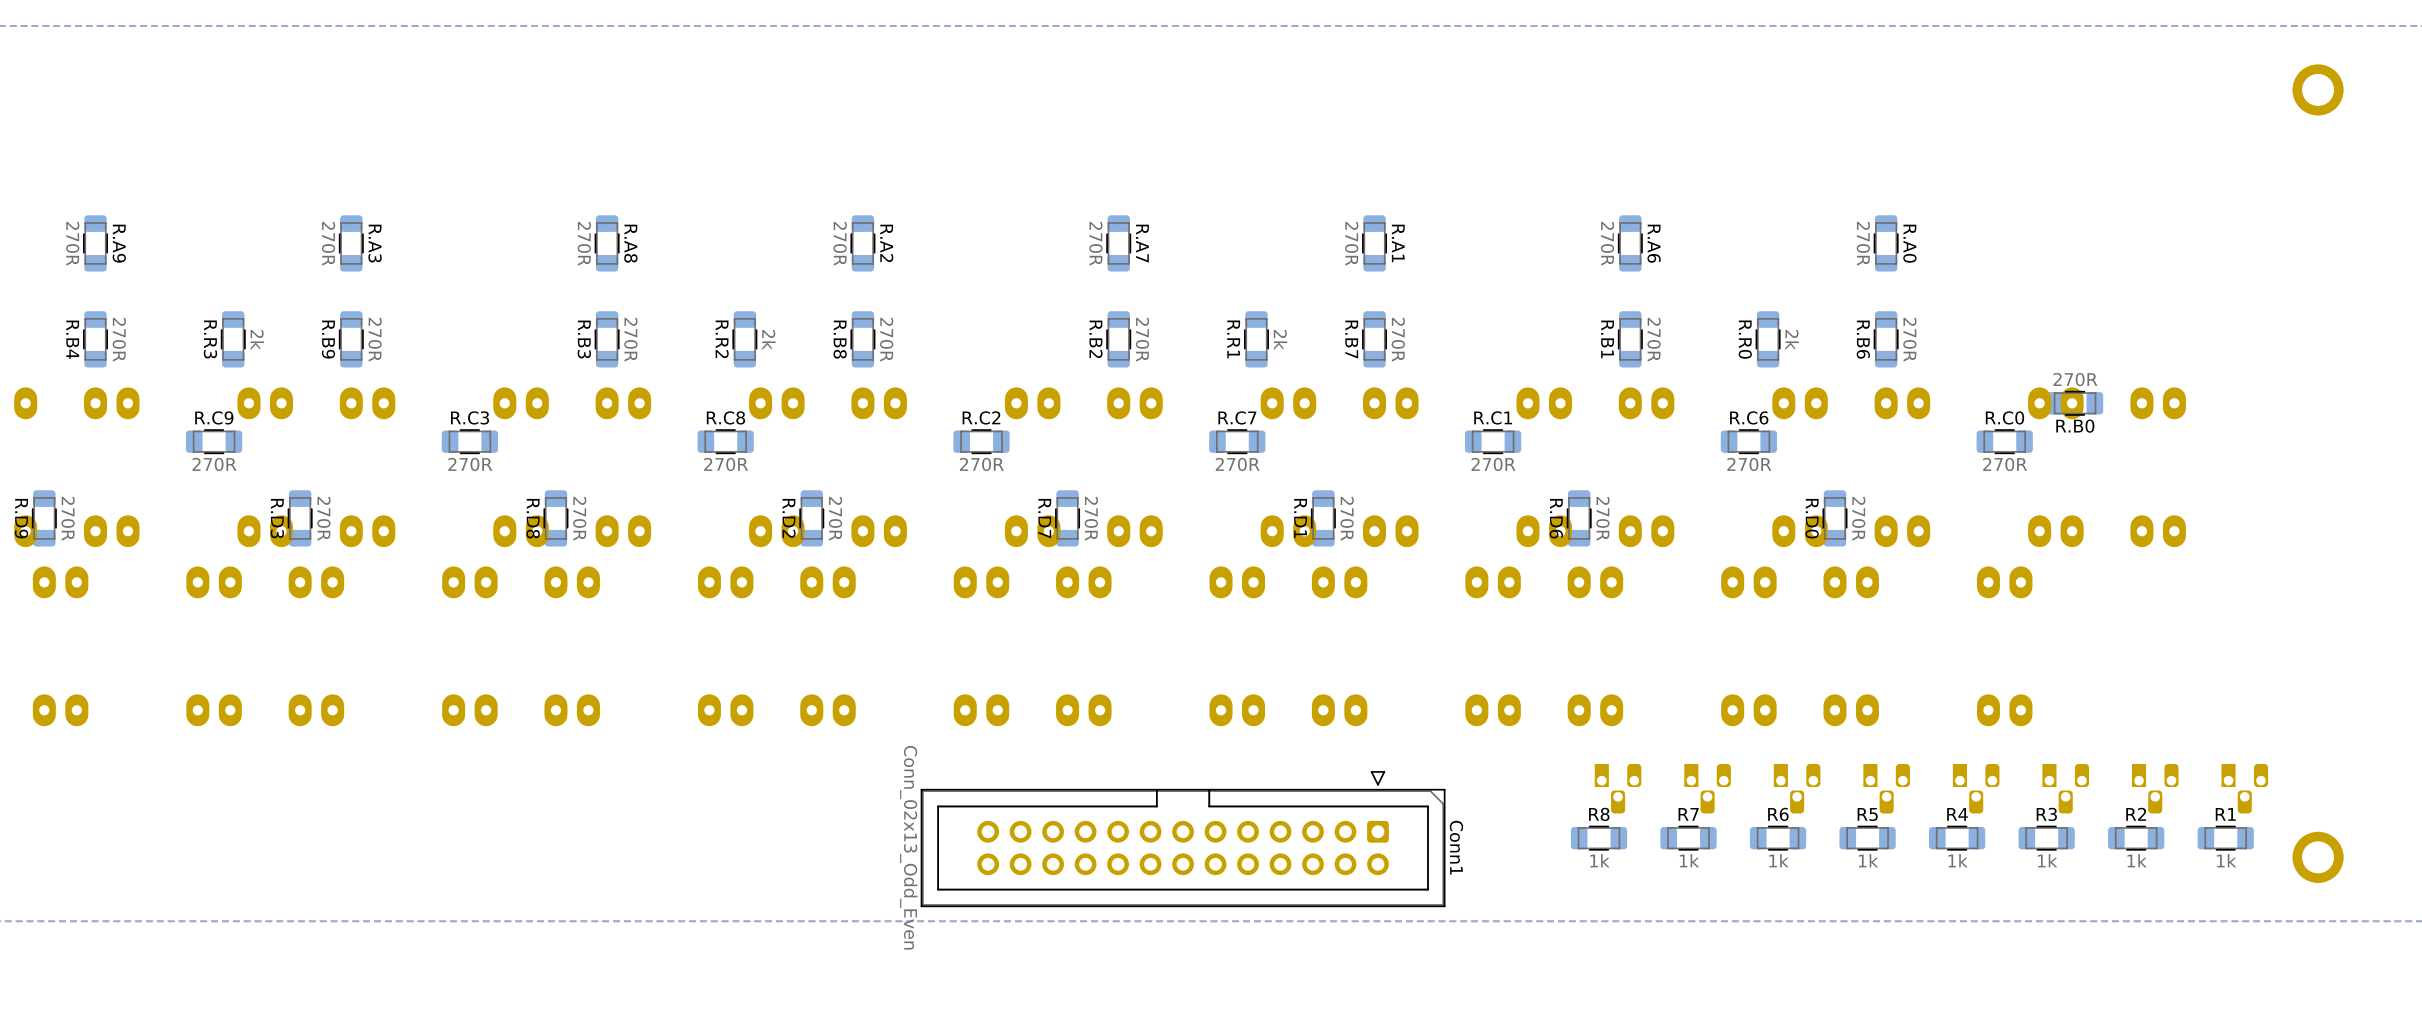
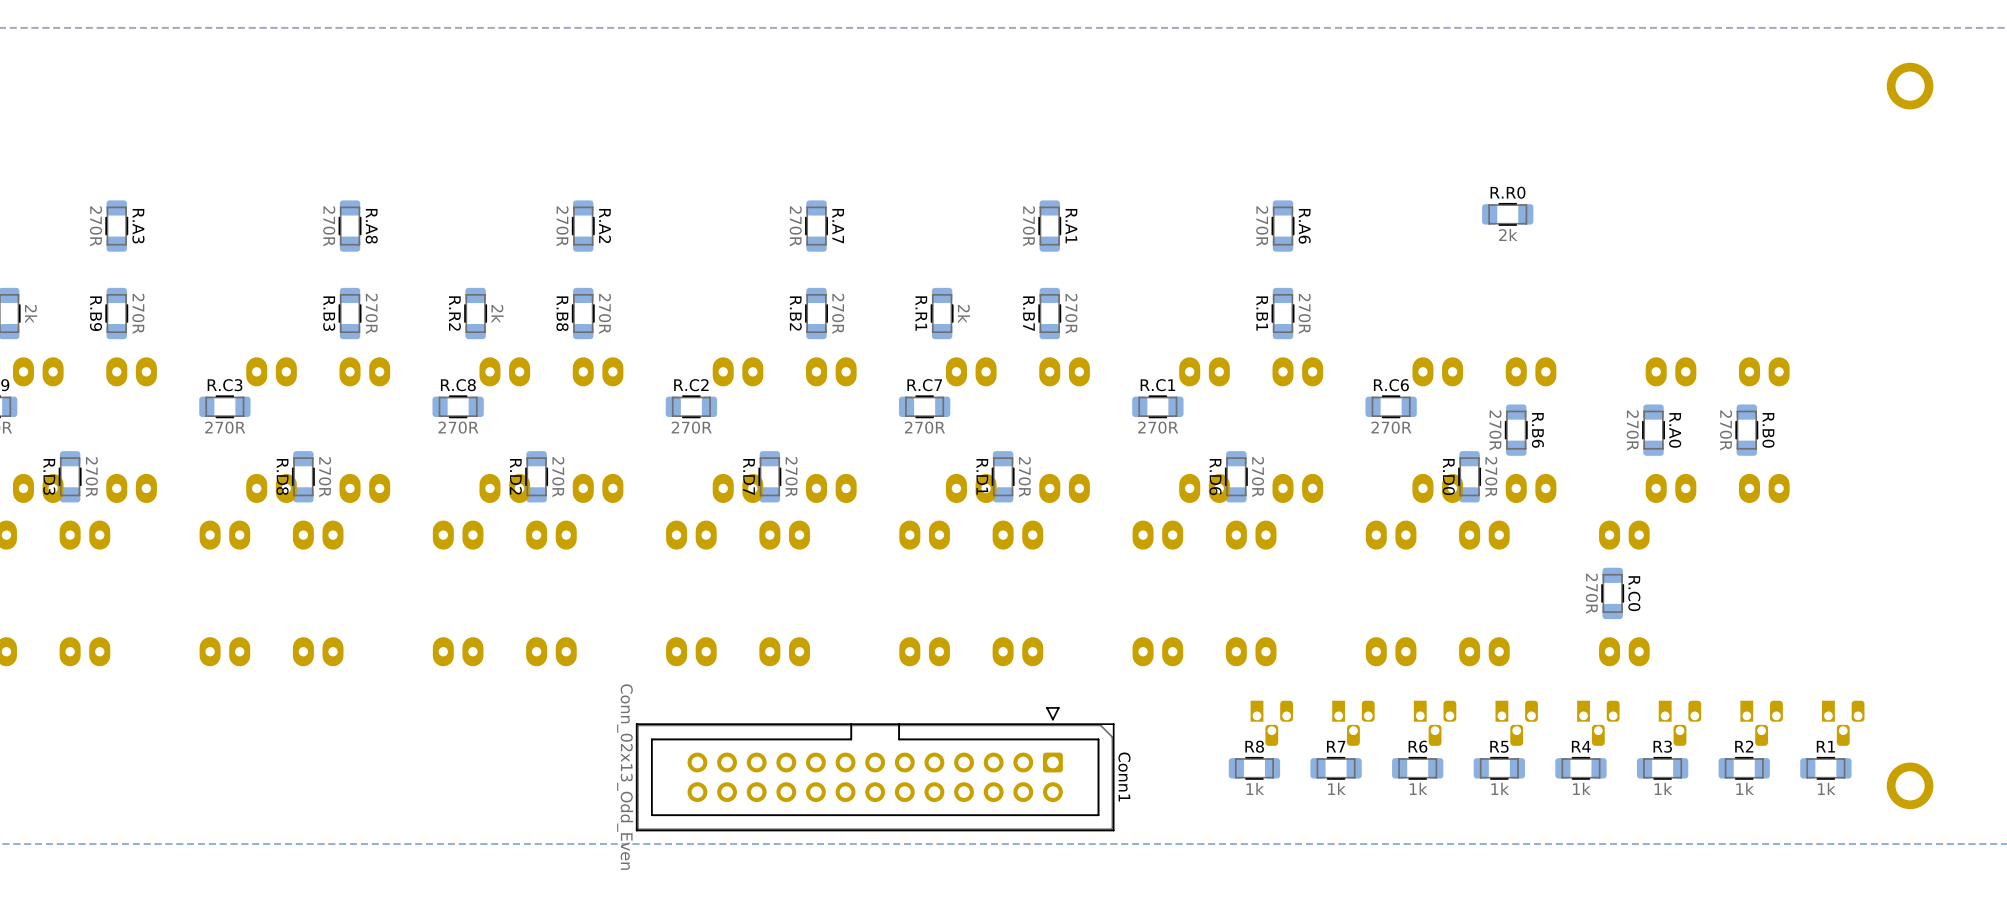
R.A0 position: (1886, 243) -> (1653, 430)
R.R0 rotation: 0° (1768, 339) -> 90° clockwise (1507, 214)
R.R0 position: (1768, 339) -> (1507, 214)
R.B6 name position: R.B6 (1863, 339) -> R.B6 (1537, 430)
R.B6 position: (1886, 339) -> (1516, 430)
R.B6 value position: 270R (1909, 339) -> 270R (1495, 430)
R.B0 value position: 270R (2075, 379) -> 270R (1726, 430)
R.B0 rotation: 0° (2075, 403) -> 90° clockwise (1746, 430)
R.B0 position: (2075, 403) -> (1746, 430)
R.B0 name position: R.B0 (2075, 426) -> R.B0 (1768, 430)
R.C0 rotation: 0° (2004, 441) -> 90° clockwise (1612, 593)
R.C0 position: (2004, 441) -> (1612, 593)

